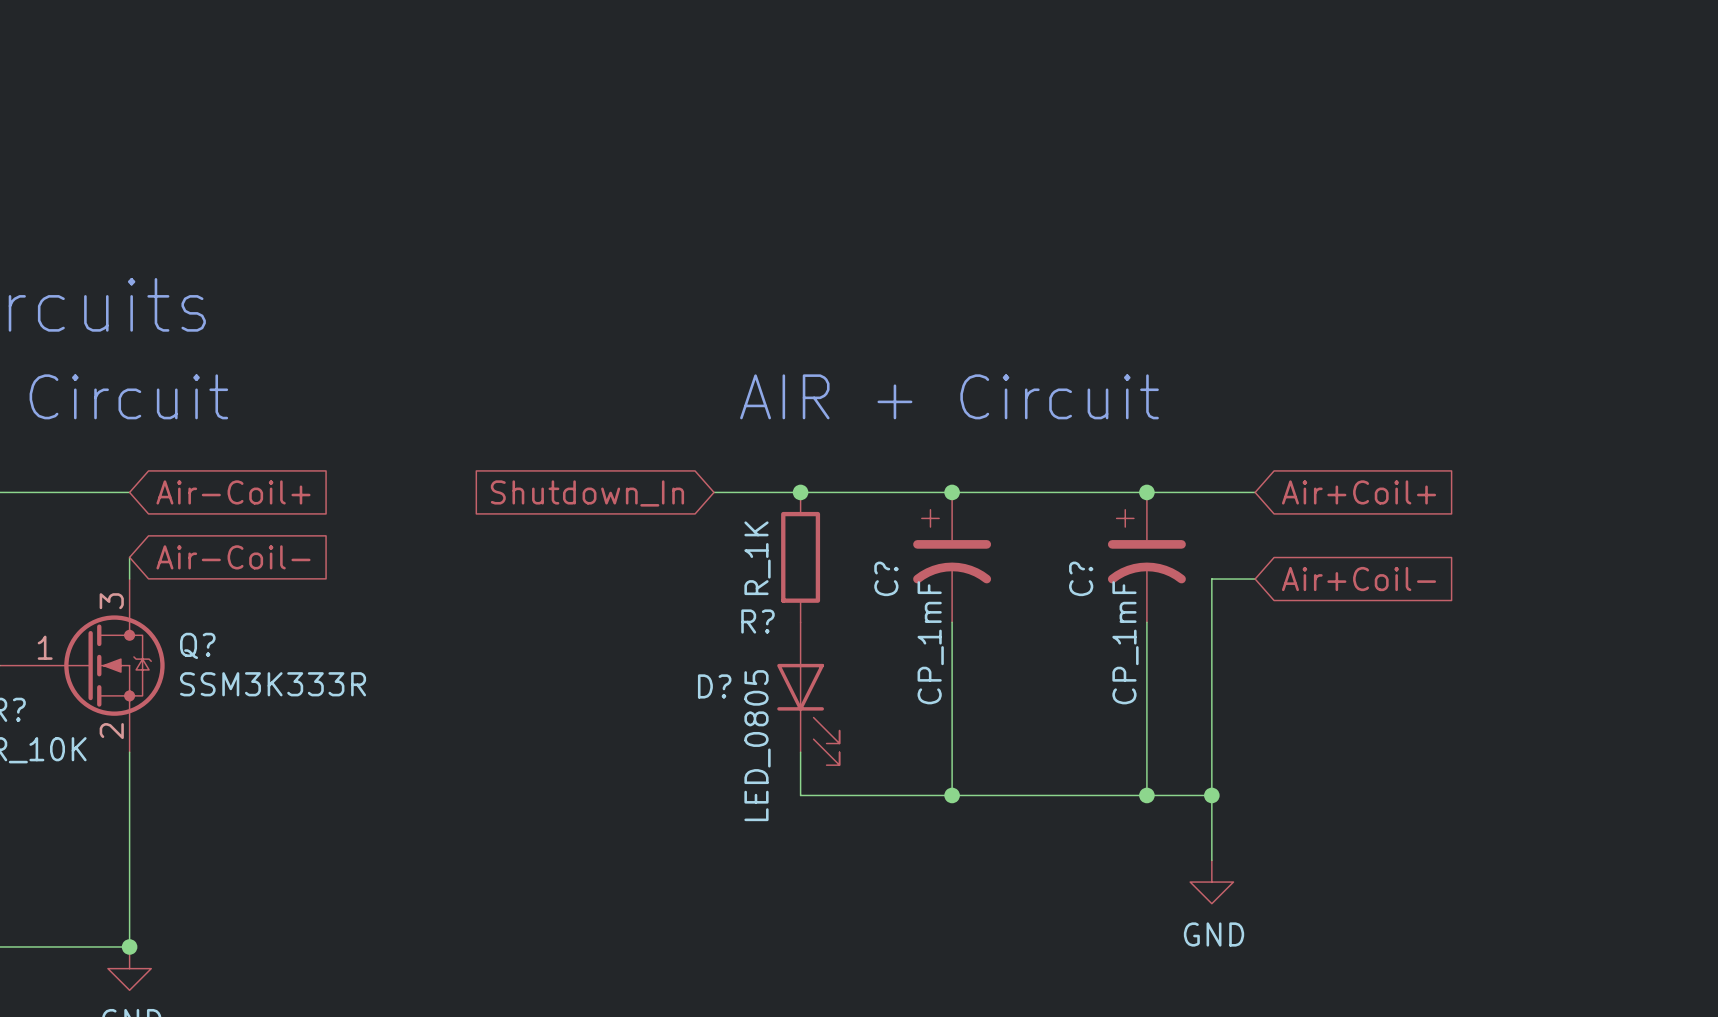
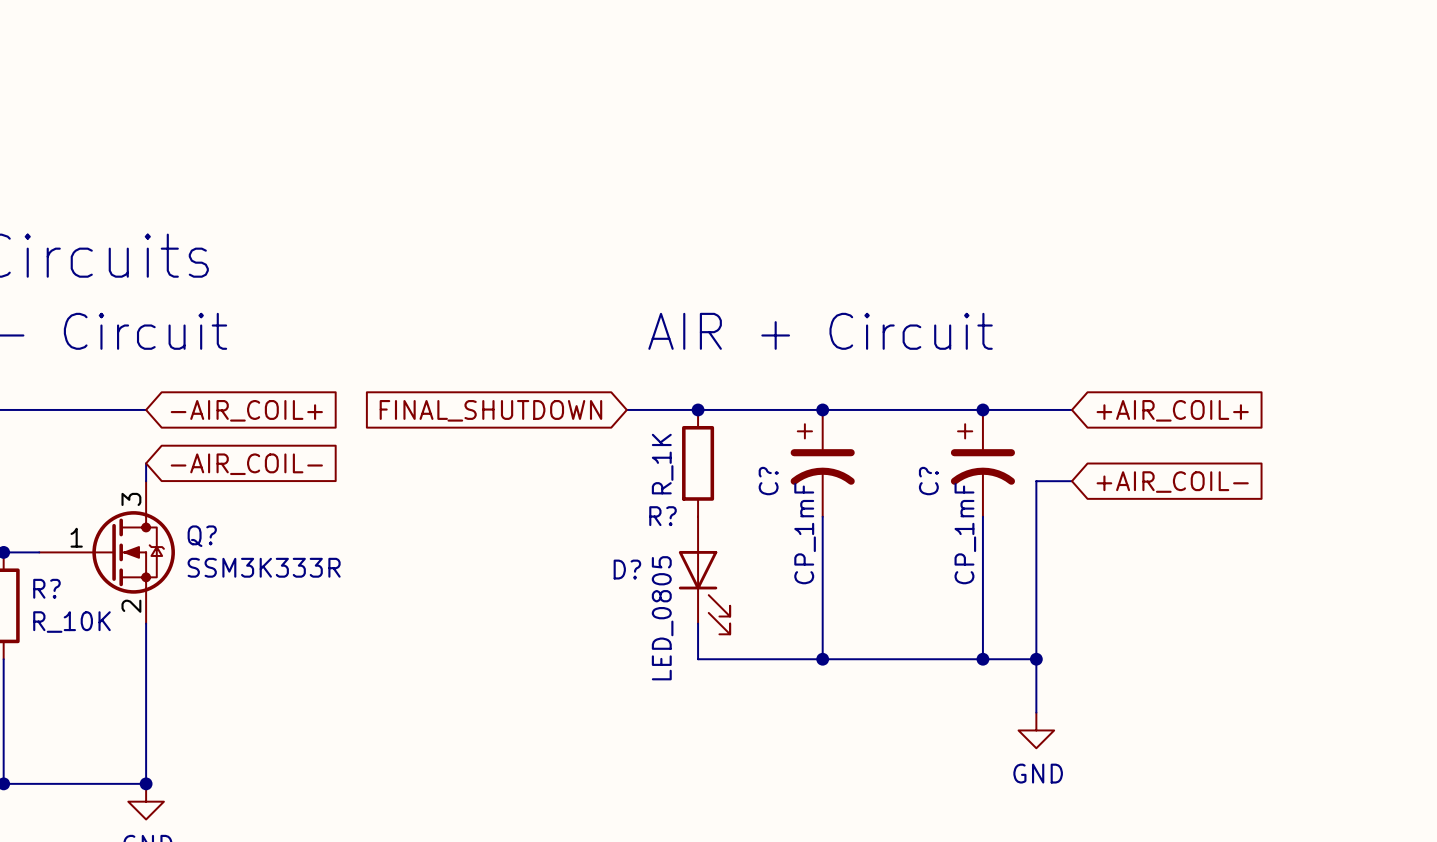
global label: Air-Coil+ (233, 492) -> -AIR_COIL+ (246, 410)
global label: Air+Coil+ (1359, 492) -> +AIR_COIL+ (1172, 410)
global label: Shutdown_In (587, 493) -> FINAL_SHUTDOWN (490, 410)
global label: Air-Coil- (233, 557) -> -AIR_COIL- (246, 464)
global label: Air+Coil- (1359, 579) -> +AIR_COIL- (1172, 482)

